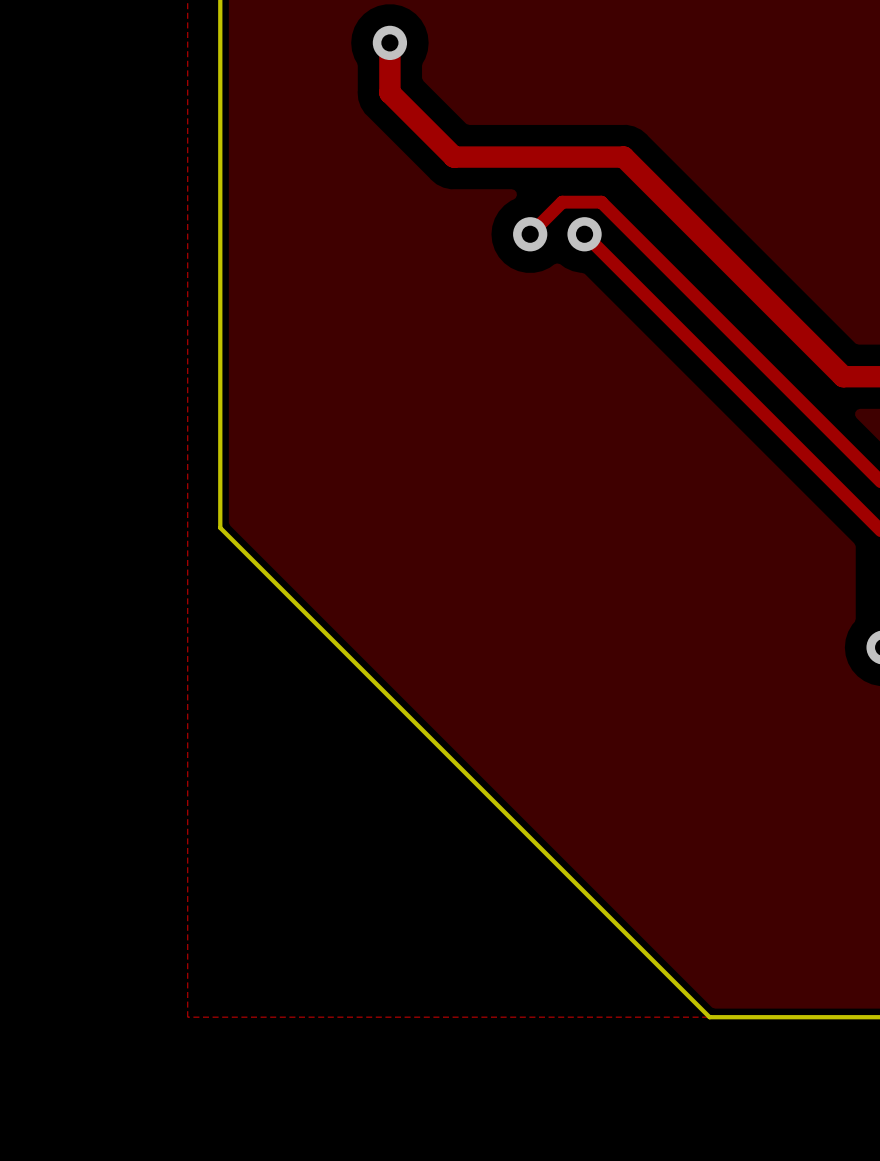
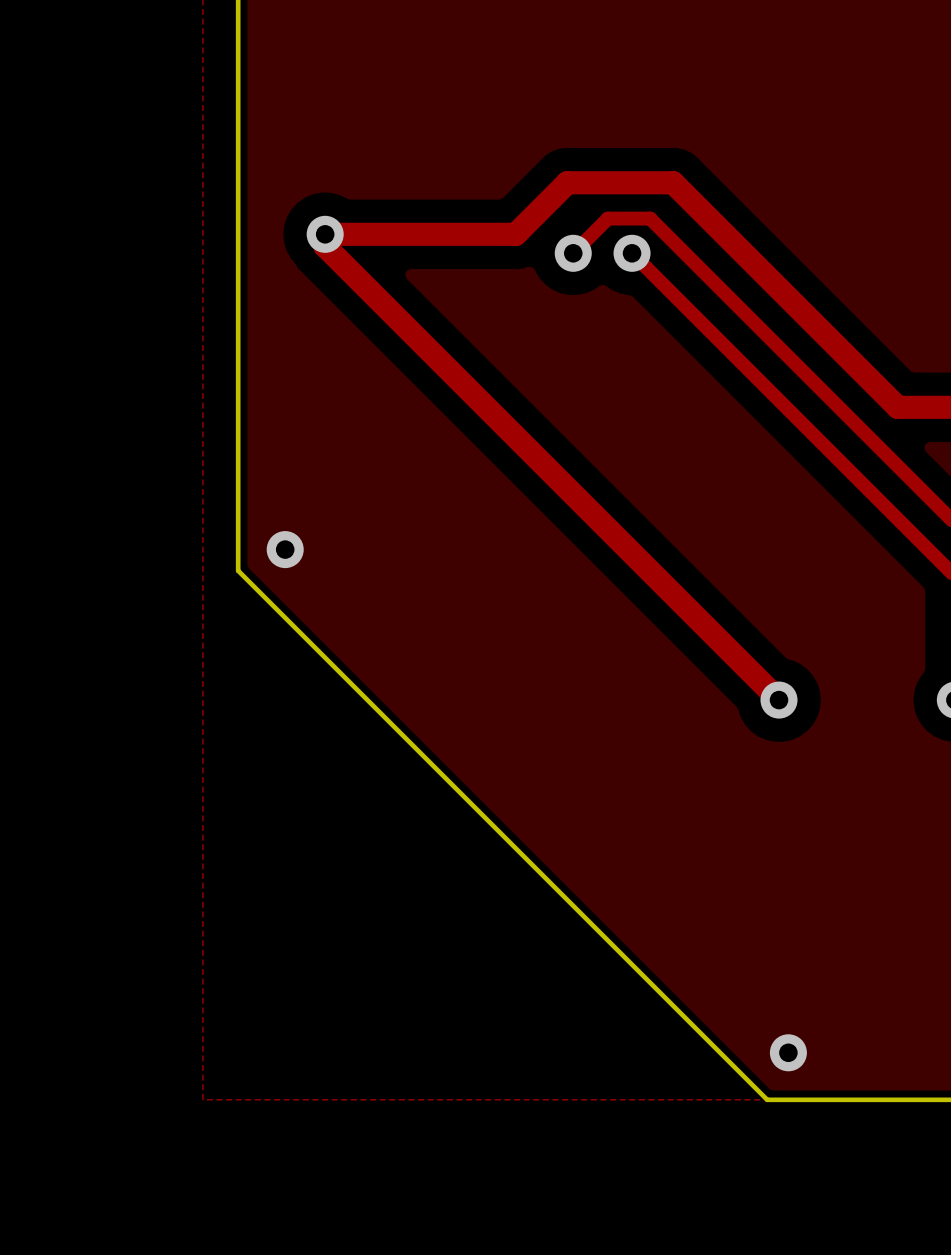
track: (389, 42) (389, 92) (454, 157) (623, 157) (843, 376) -> (779, 700) (325, 246) (325, 234) (515, 234) (567, 182) (673, 182) (897, 407) (911, 407)
via position: (389, 42) -> (325, 234)
via: none -> (285, 549)
via: none -> (779, 700)
via: none -> (788, 1052)

